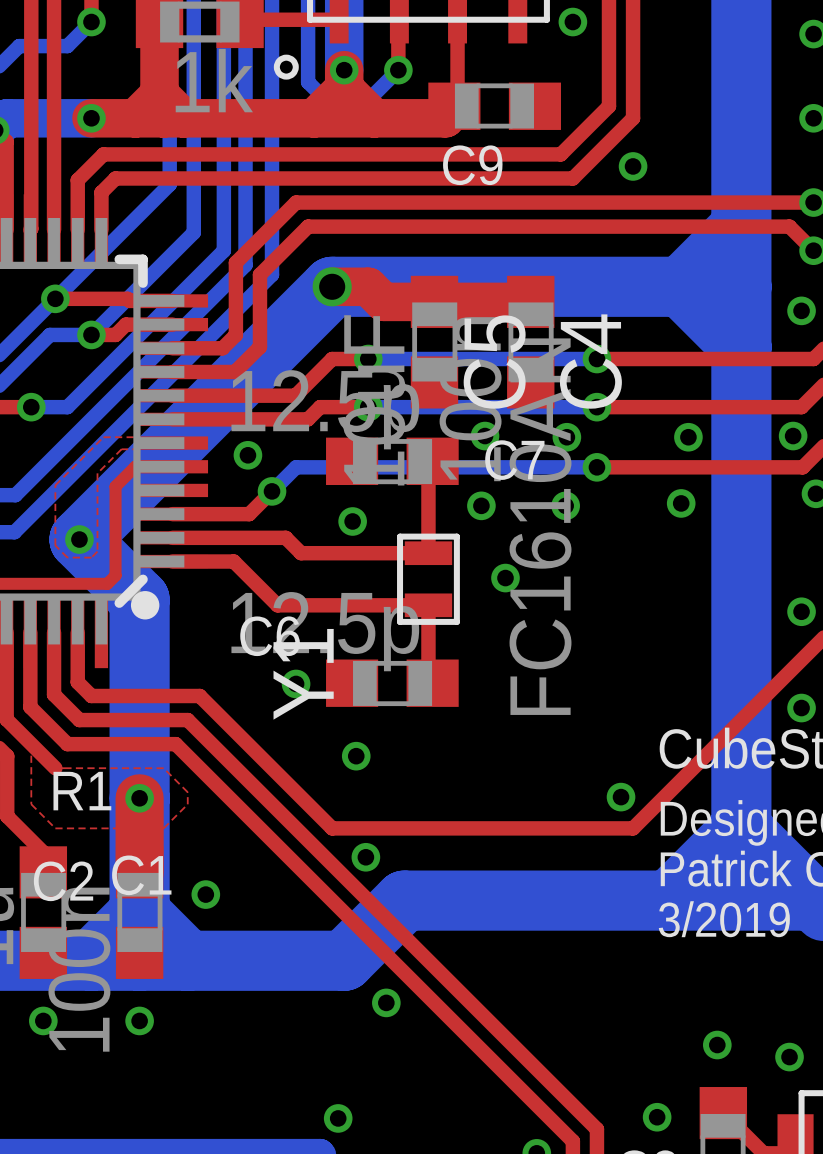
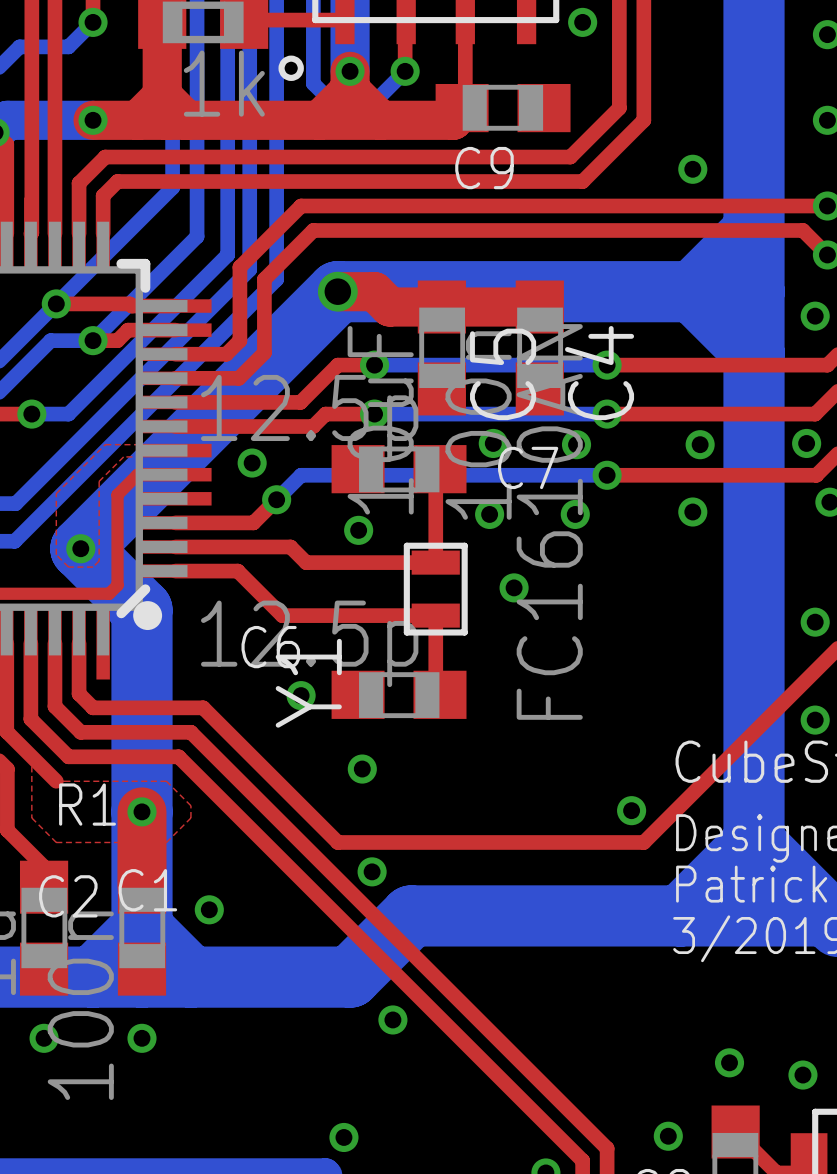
via position: (633, 166) -> (692, 169)

